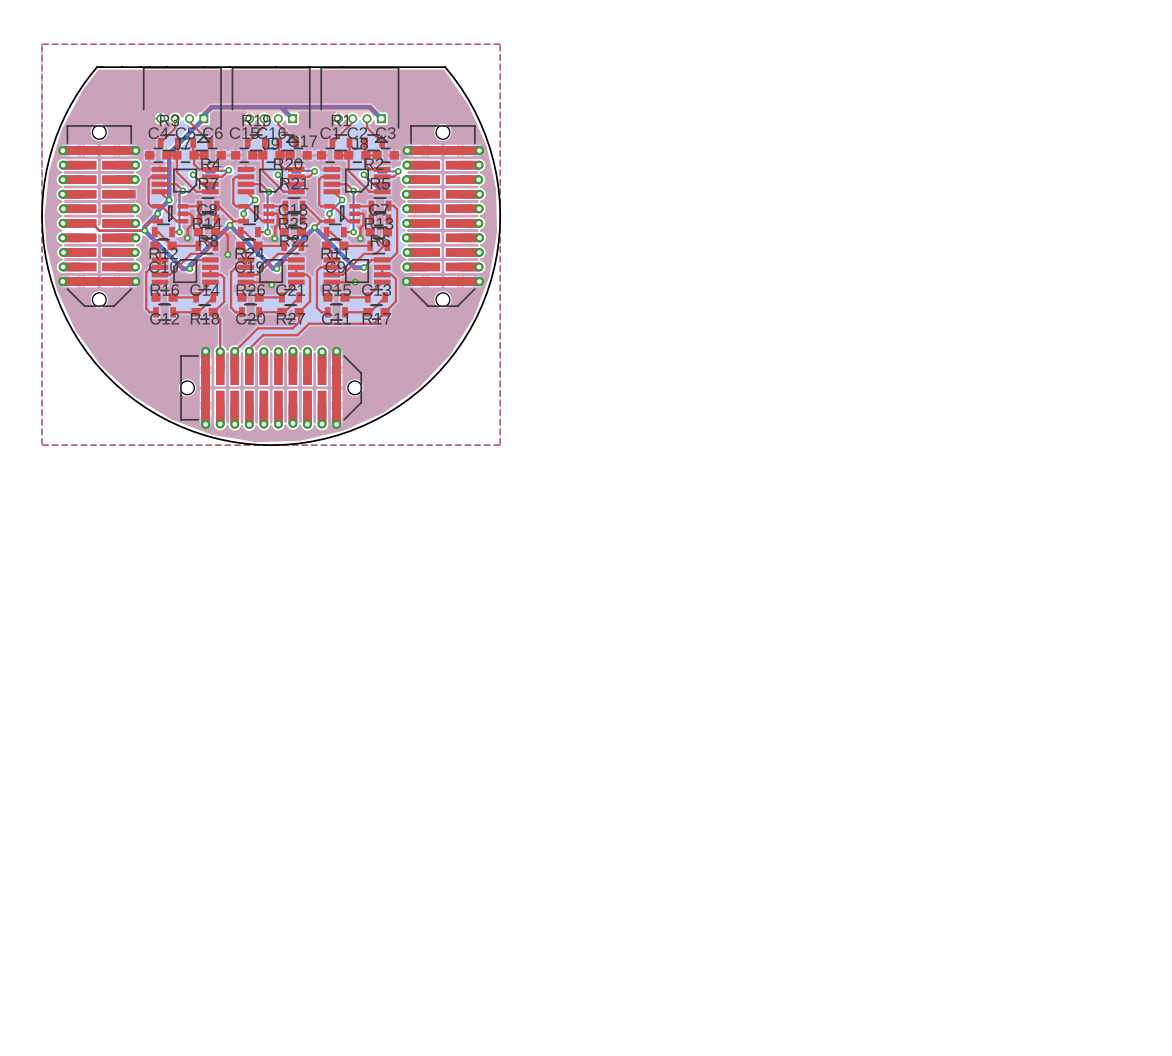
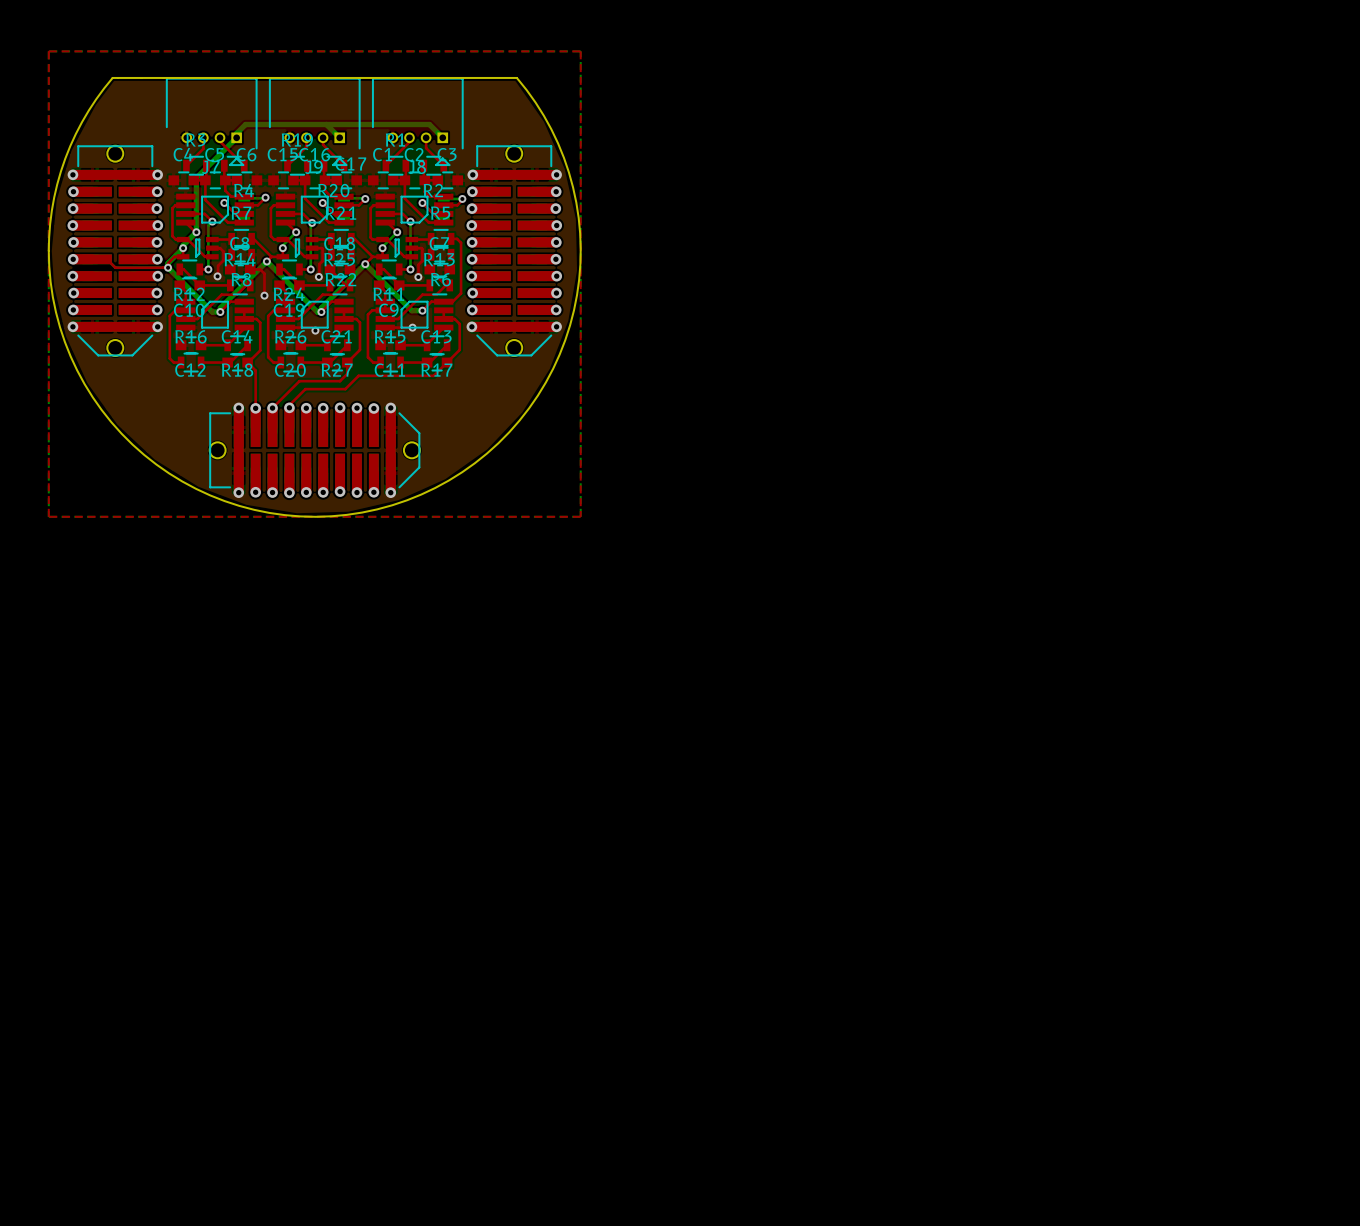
via: none -> (157, 225)

